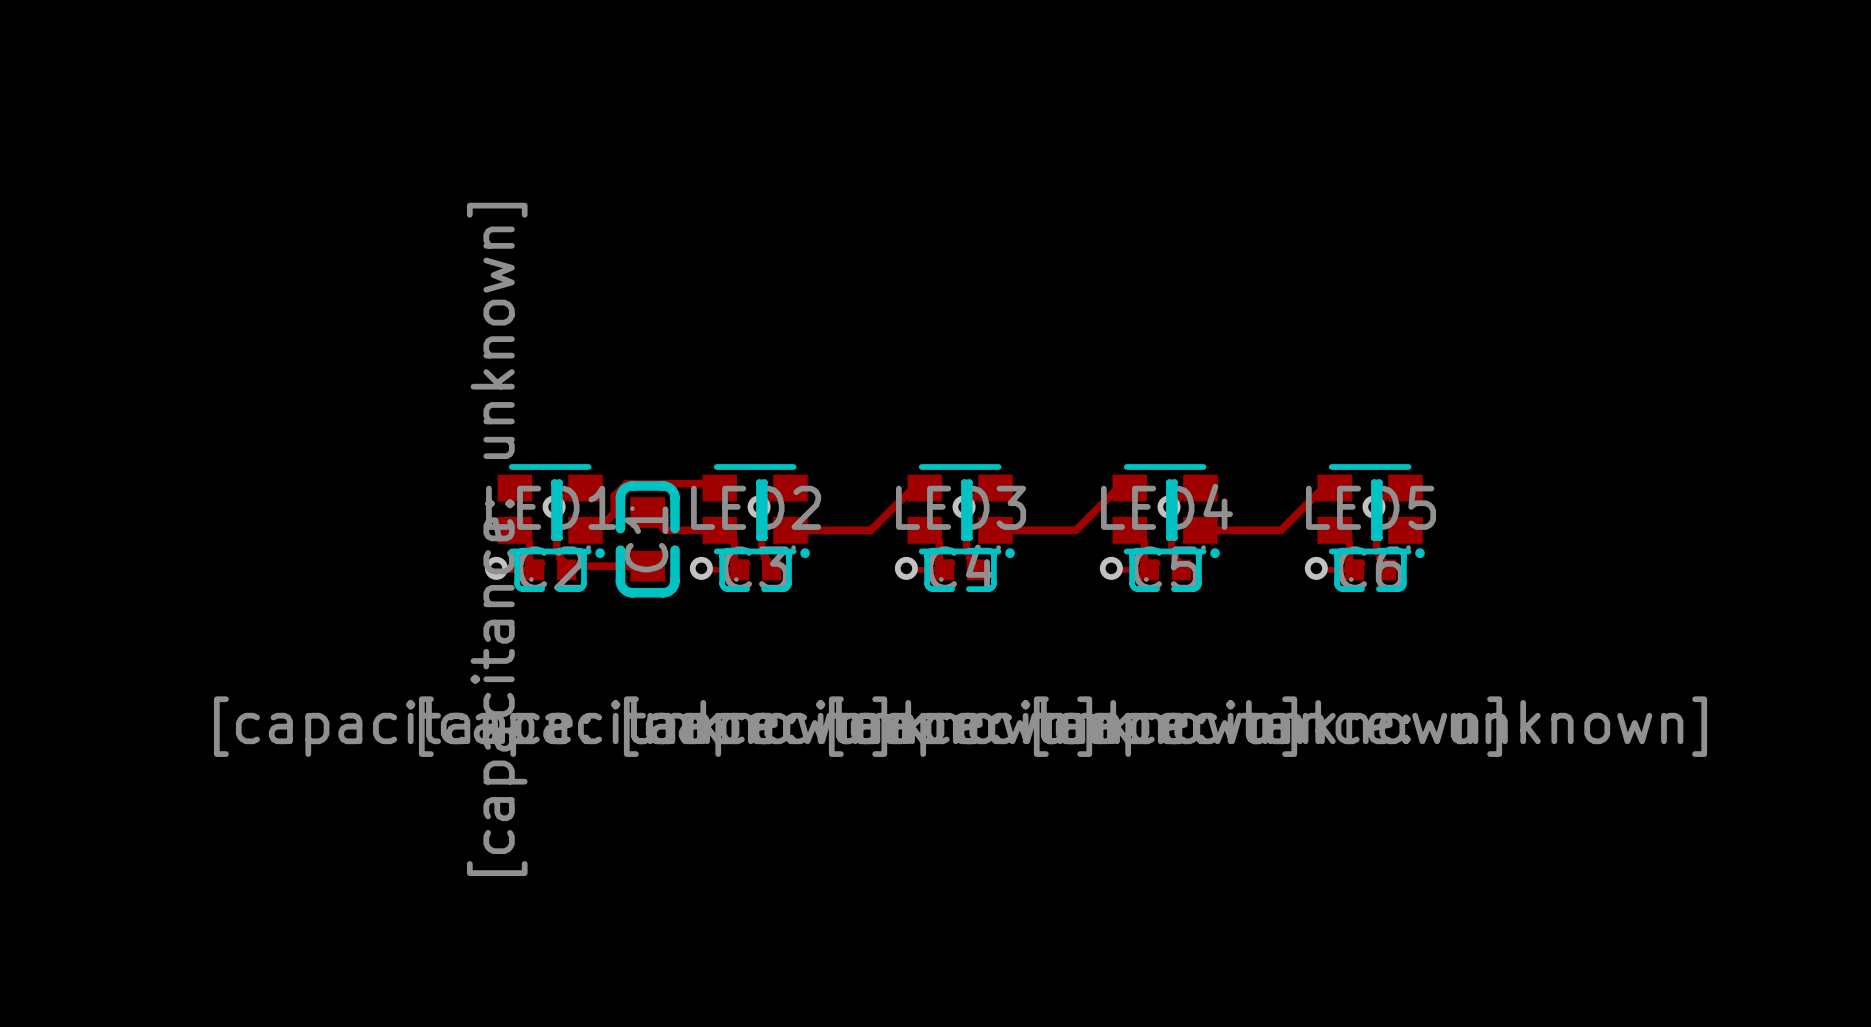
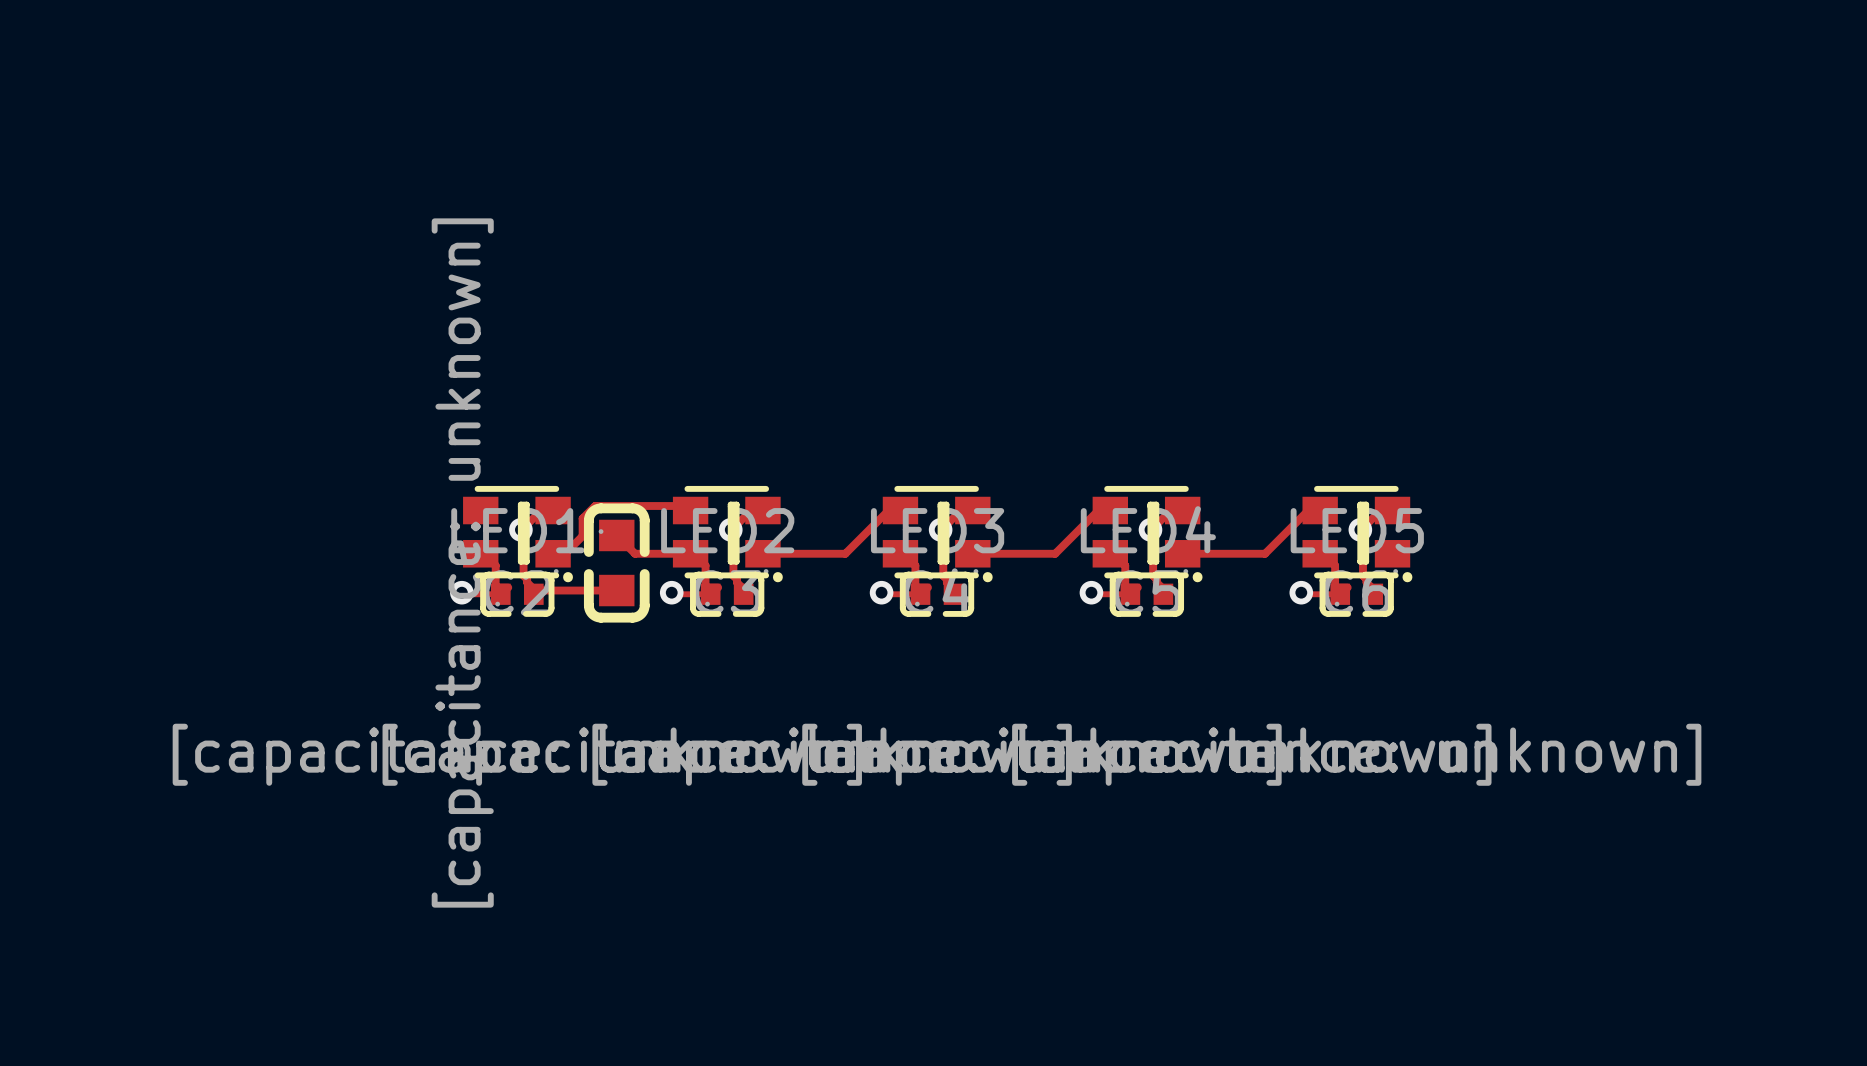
C1 name: C1 (646, 539) -> none

